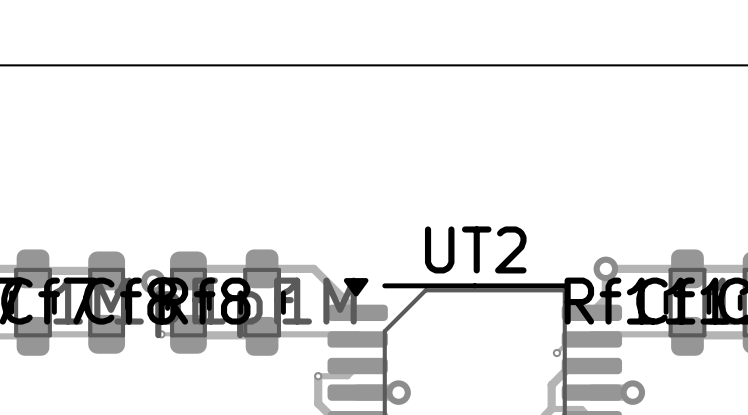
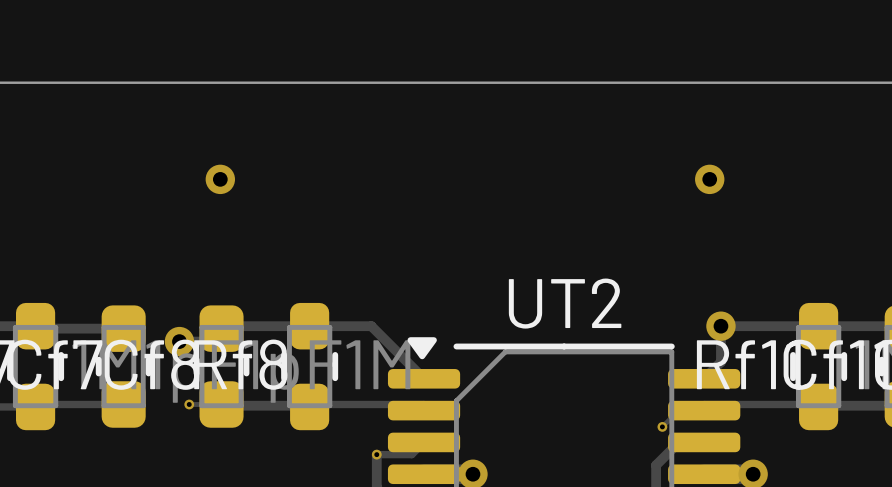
via: none -> (220, 179)
via: none -> (709, 179)

